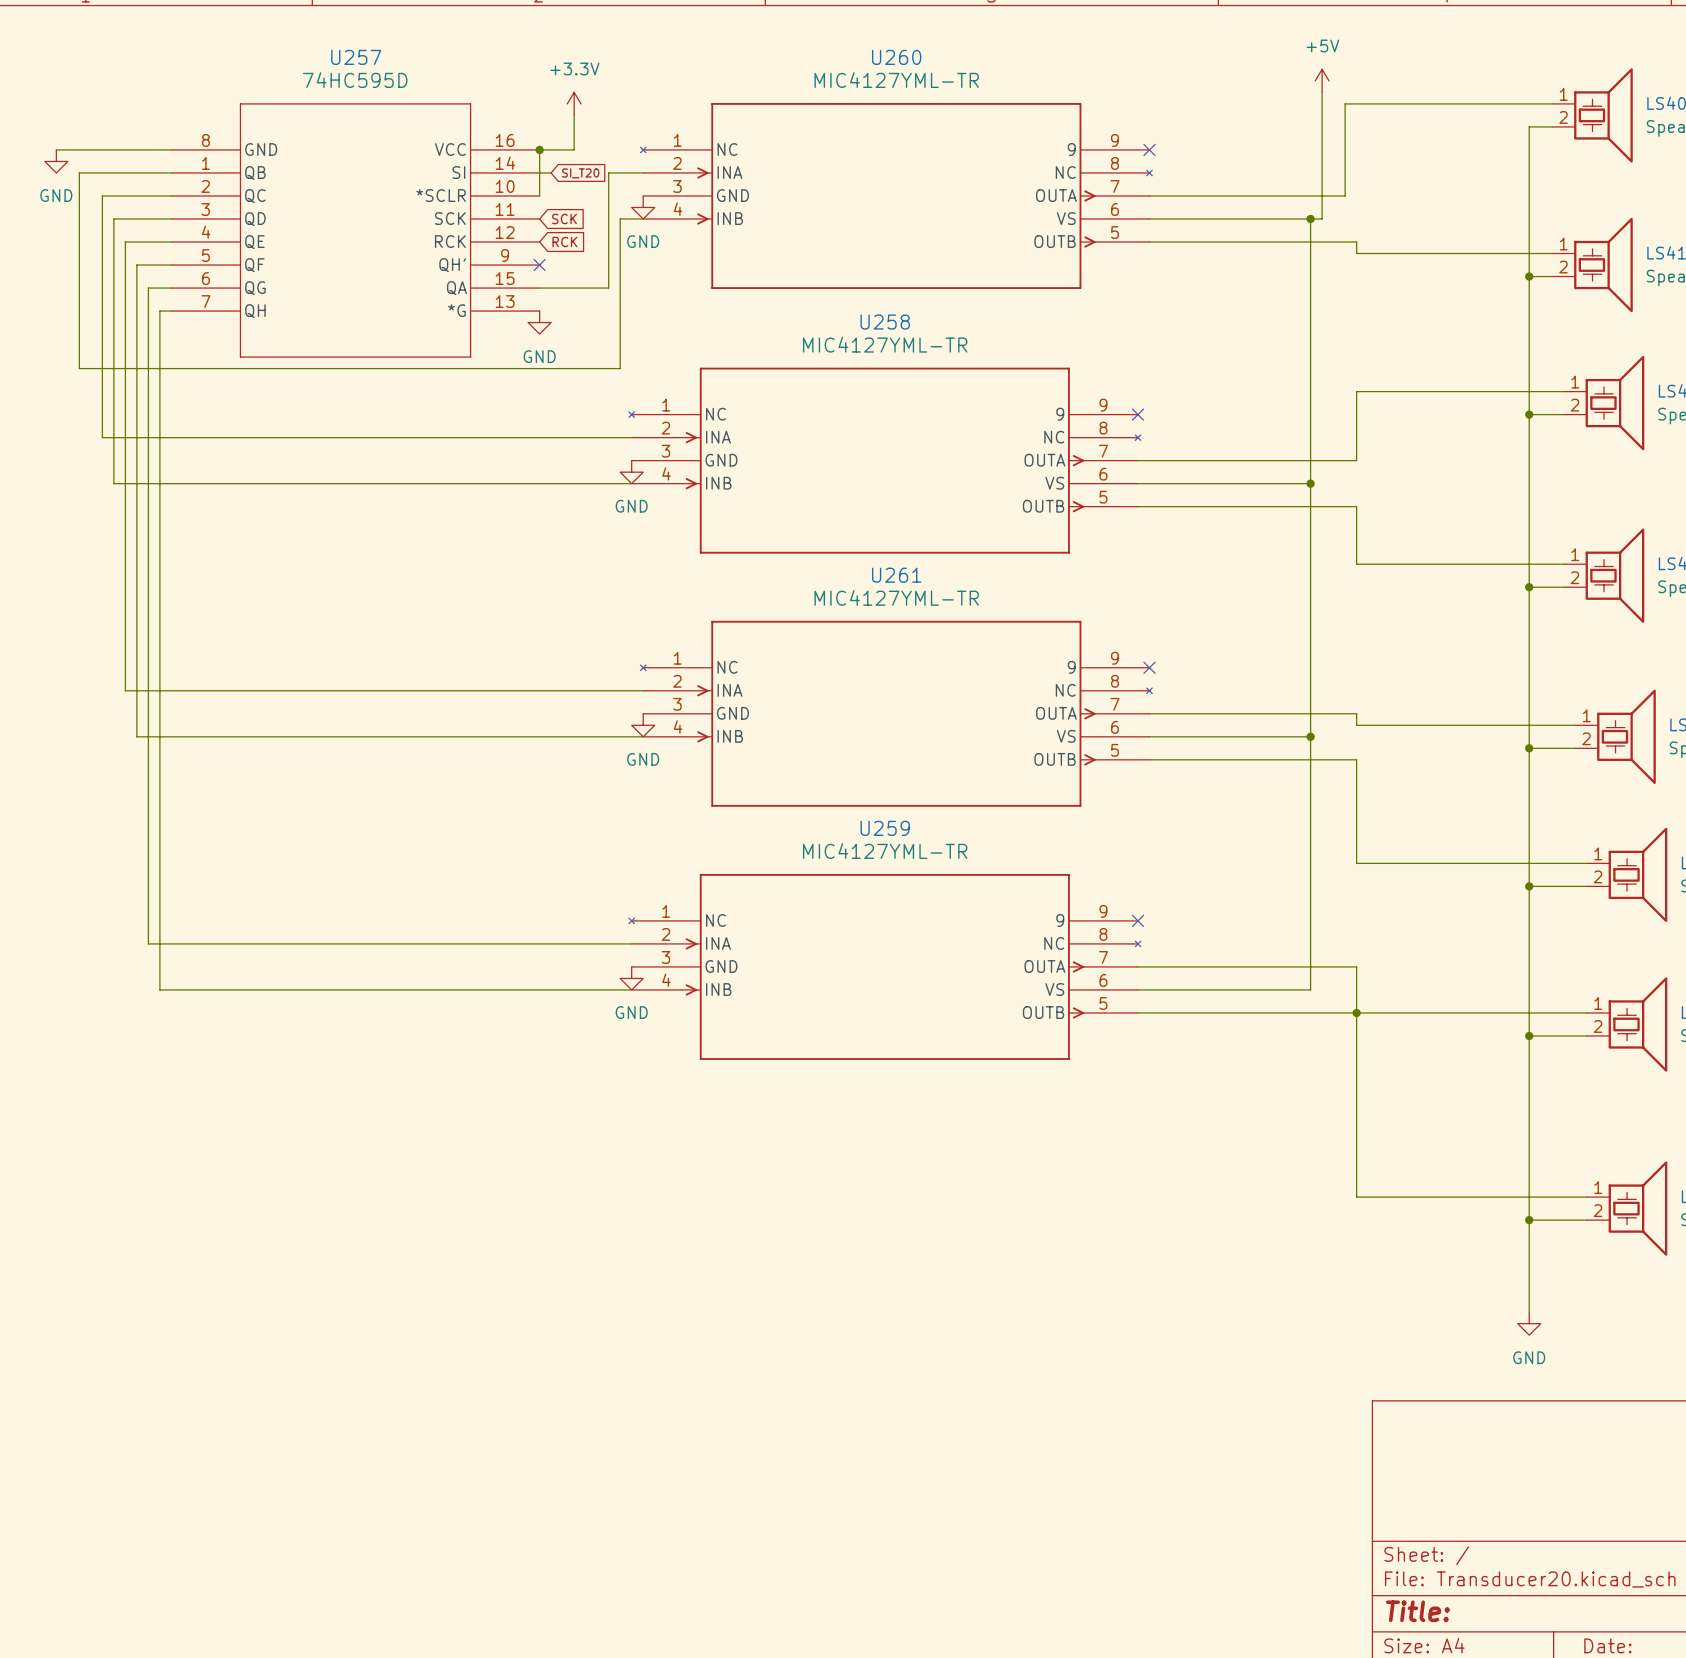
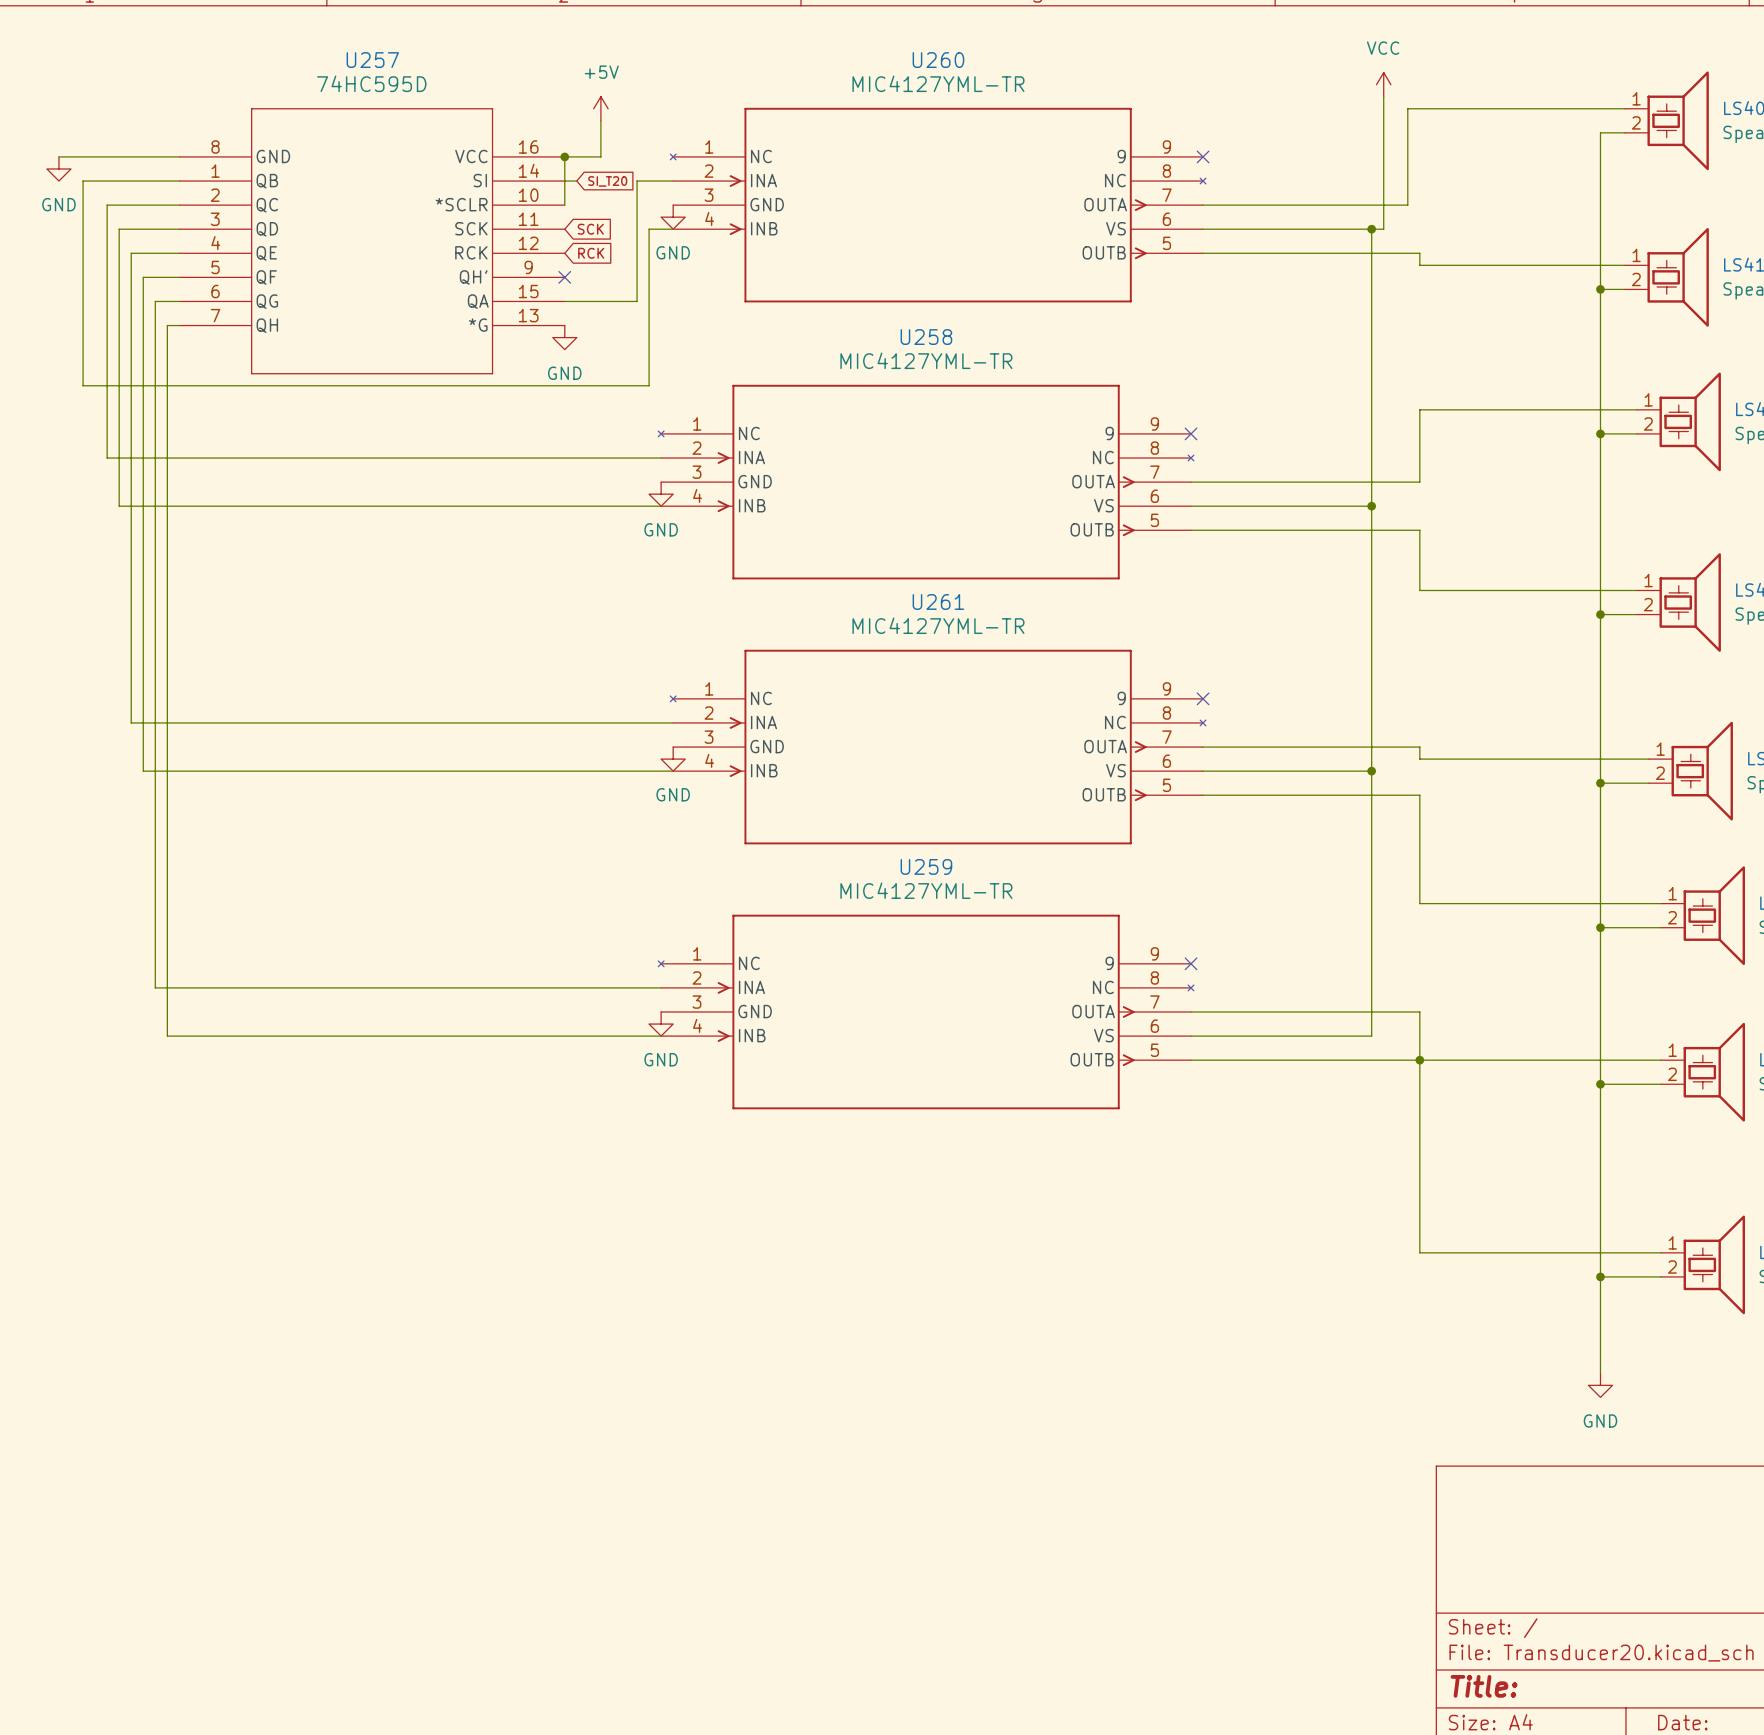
power symbol: +5V (1322, 80) -> VCC (1383, 84)
power symbol: +3.3V (574, 103) -> +5V (600, 108)

